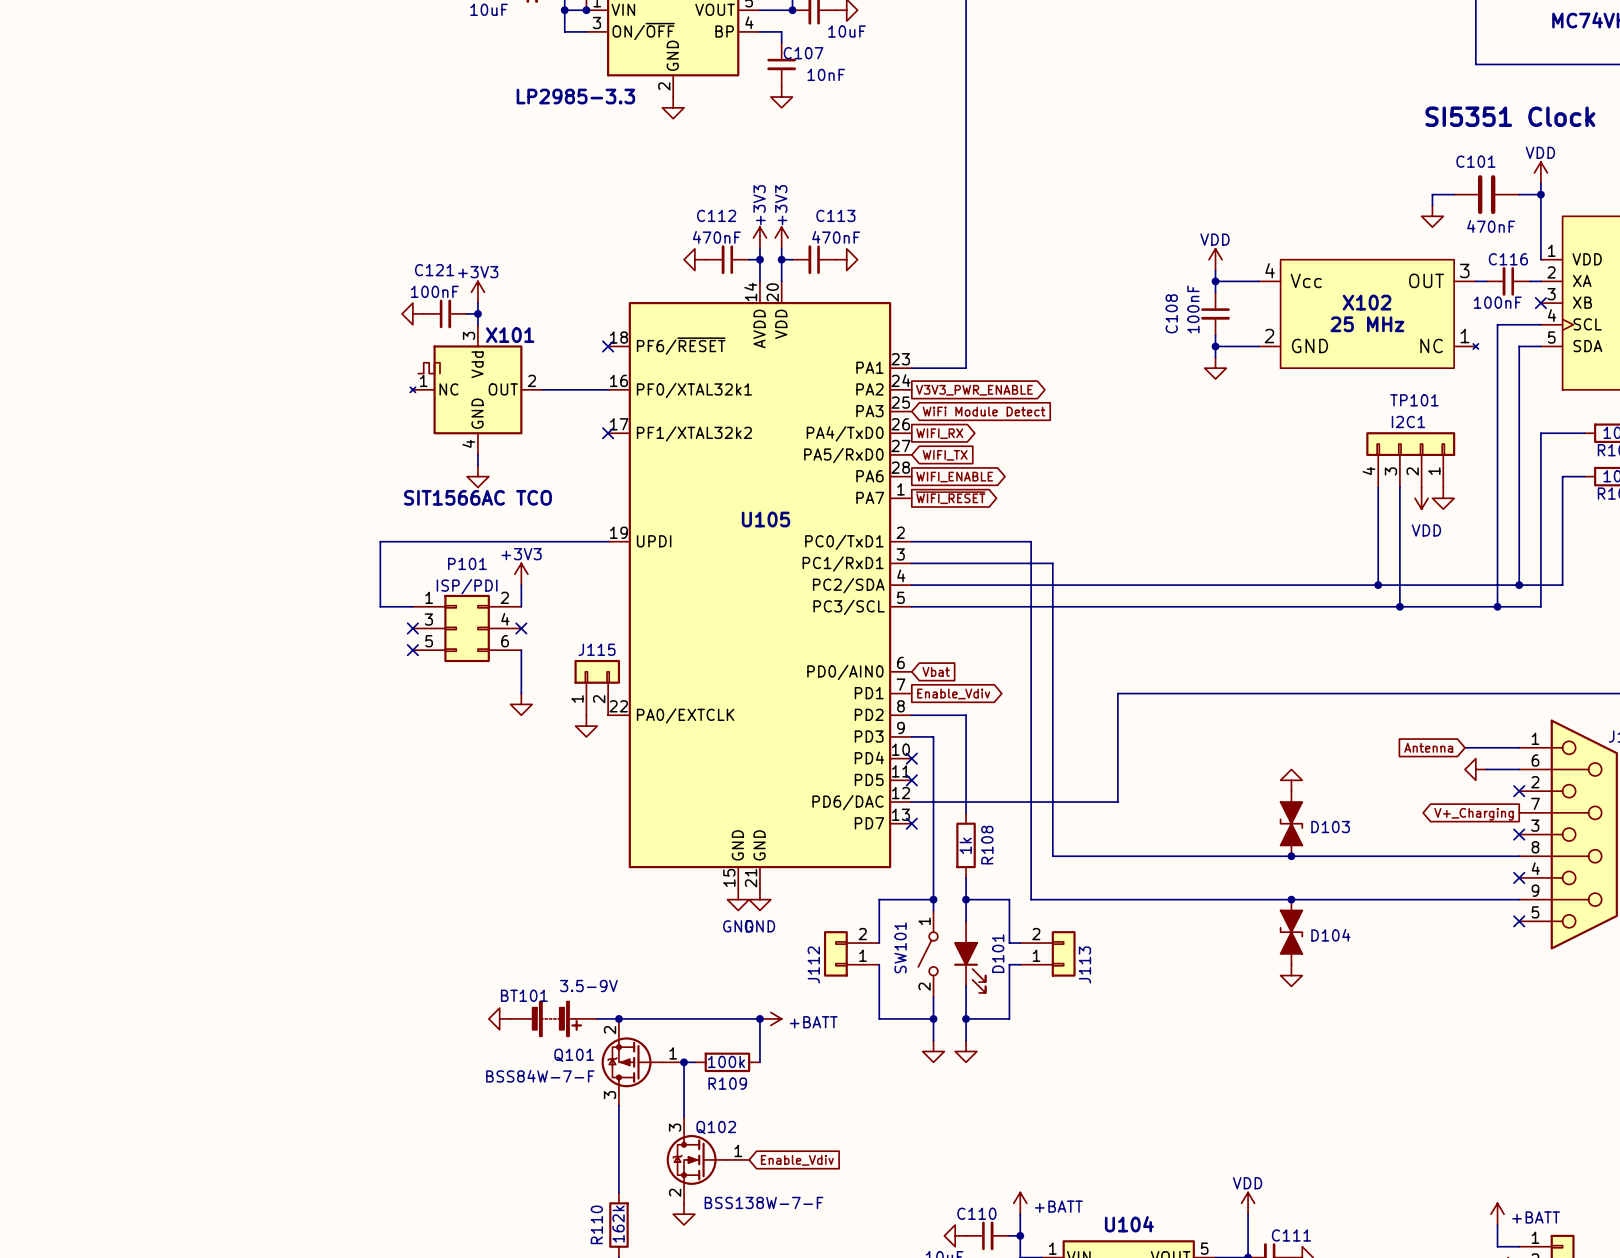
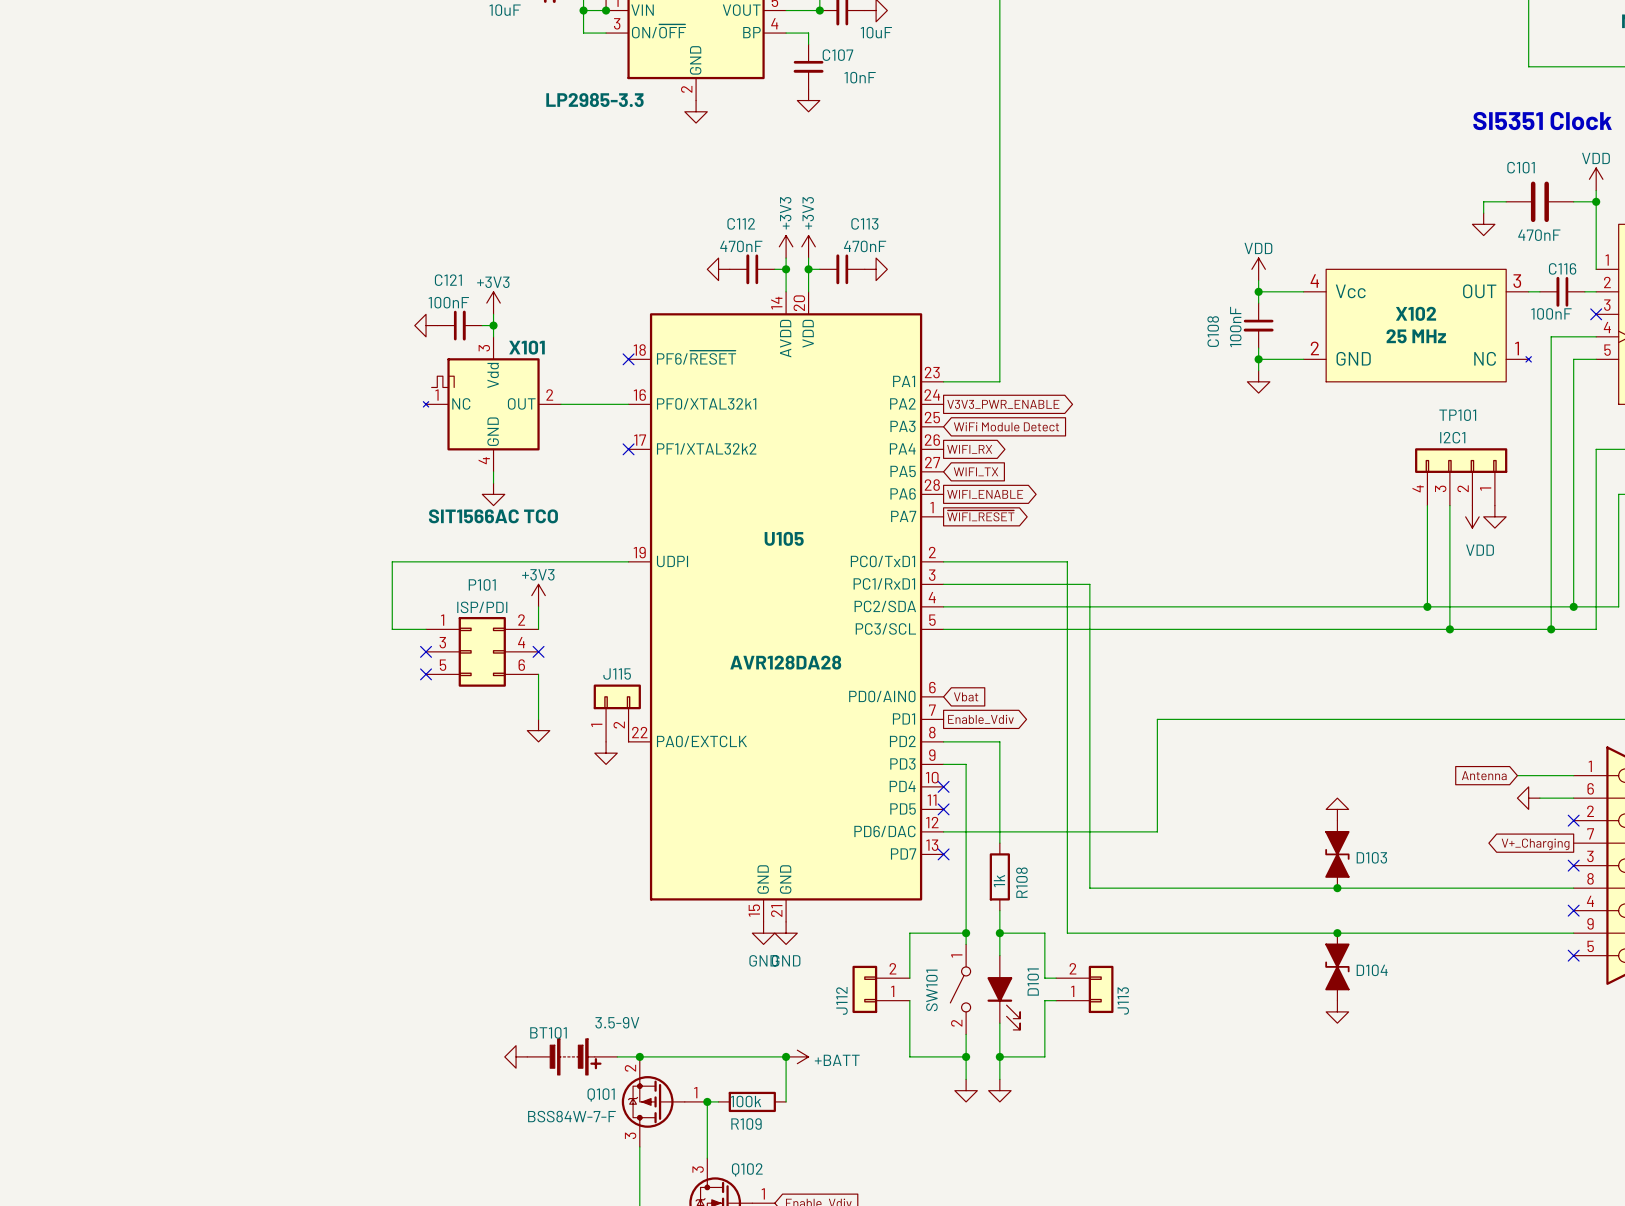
U105 pin name: PA4/TxD0 (845, 433) -> PA4 (902, 448)
U105 pin name: PA5/RxD0 (843, 455) -> PA5 (903, 471)
U105 pin name: UPDI (654, 541) -> UDPI (672, 561)
U105 value: none -> AVR128DA28 (785, 662)

